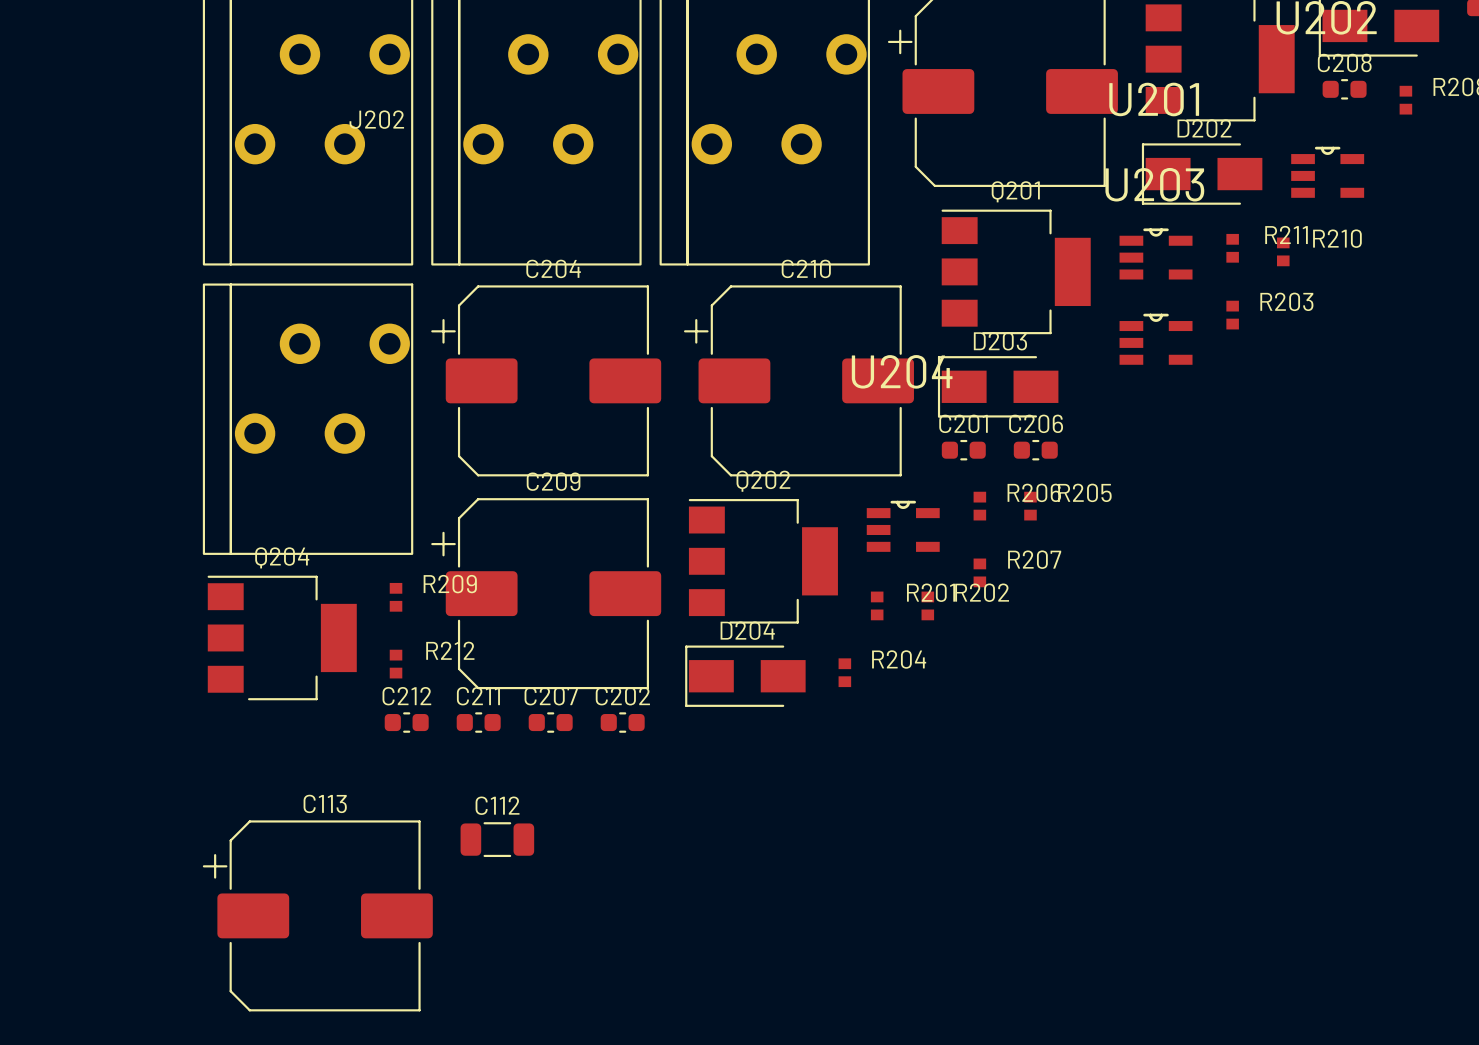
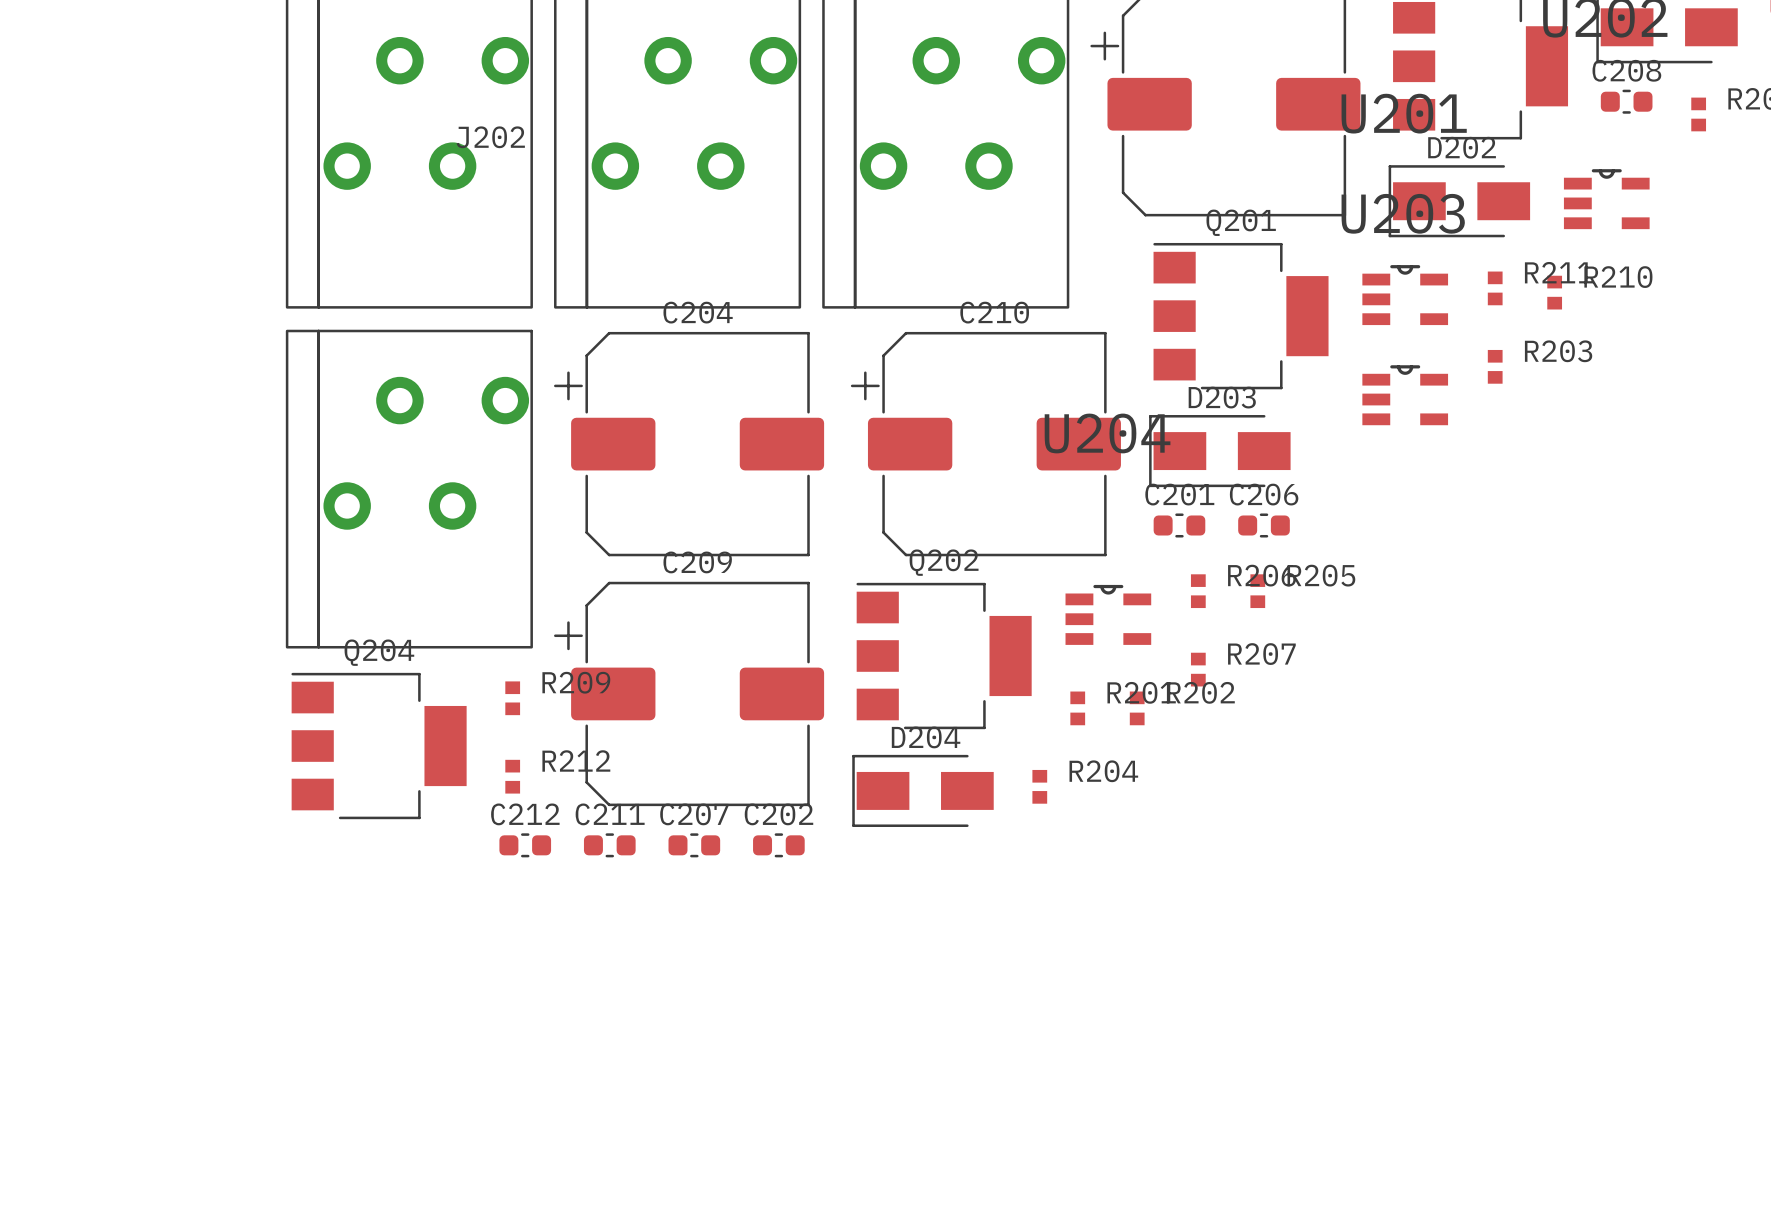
C112: (497, 839) -> none
C113: (317, 915) -> none

